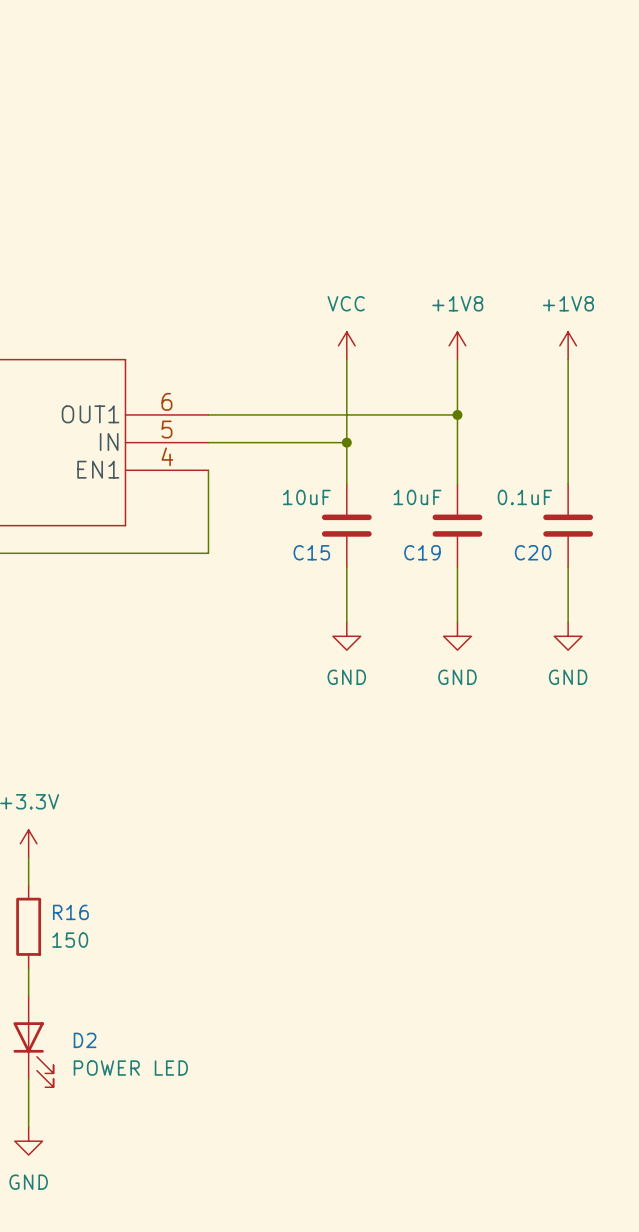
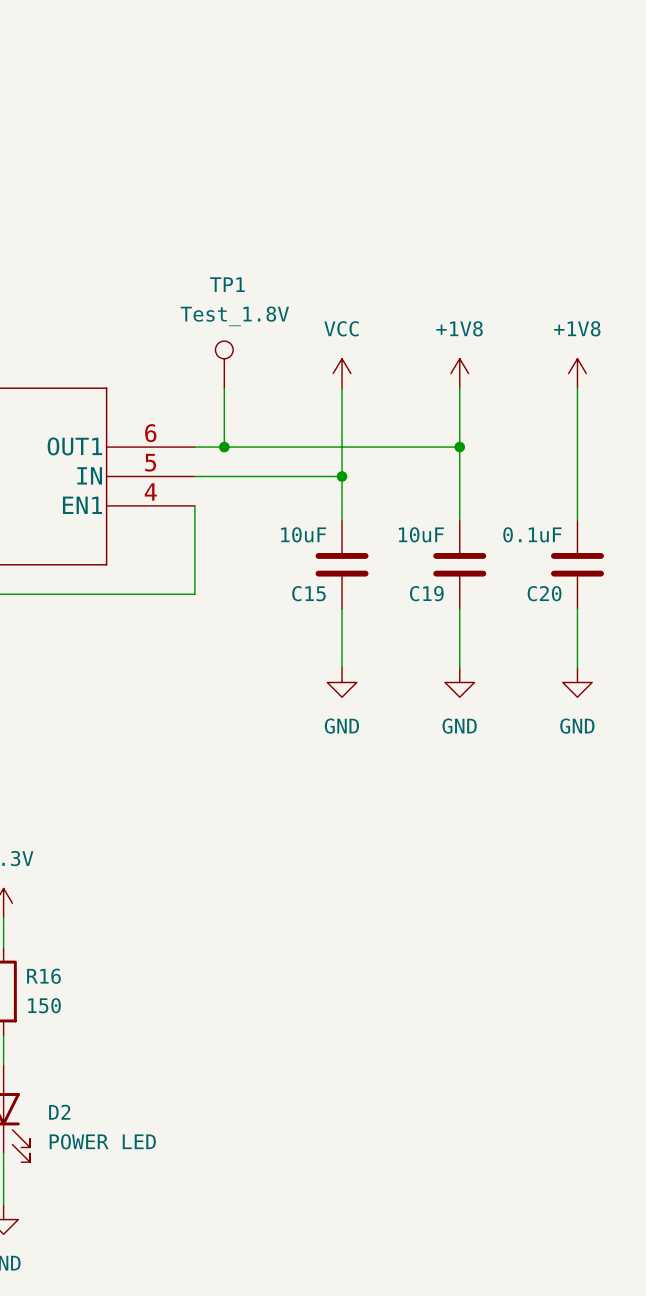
TP1: none -> Test_1.8V (224, 364)
wire: none -> (224, 388) (224, 447)
junction: none -> (224, 447)

